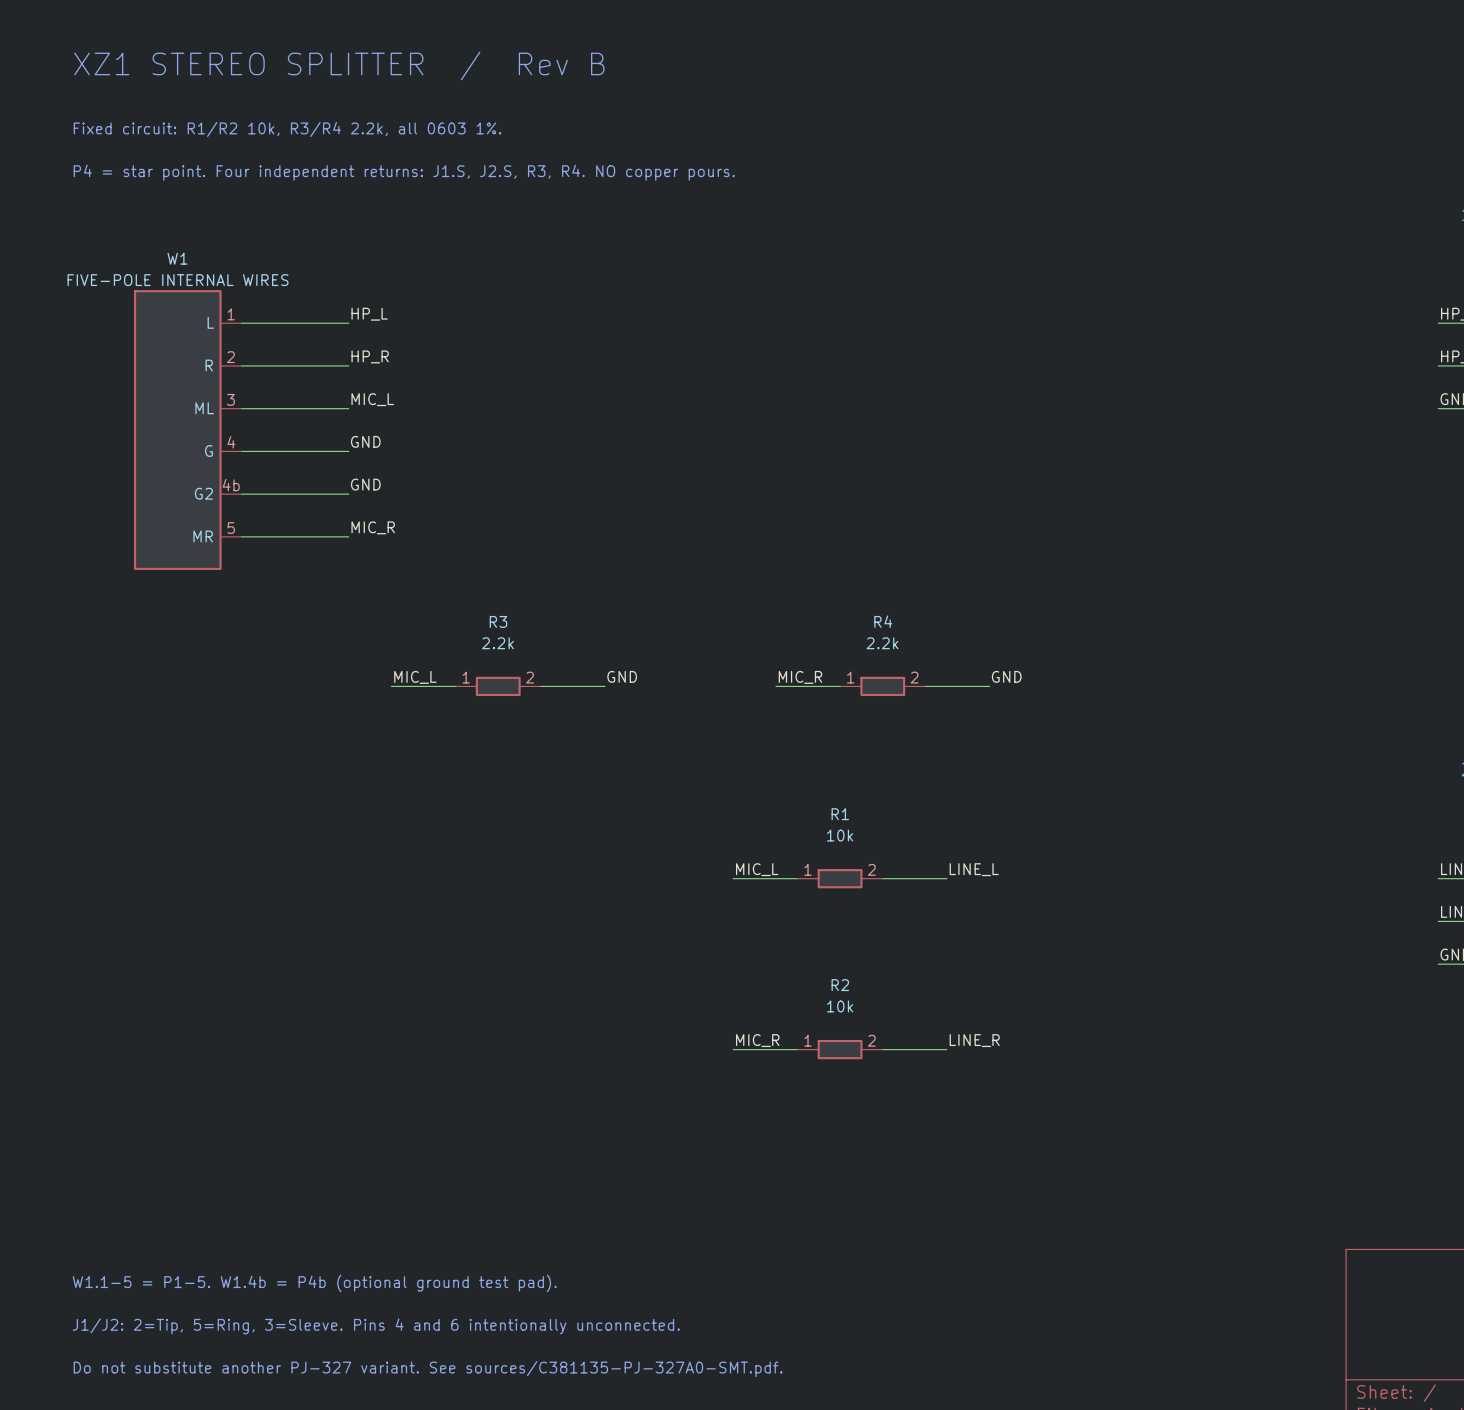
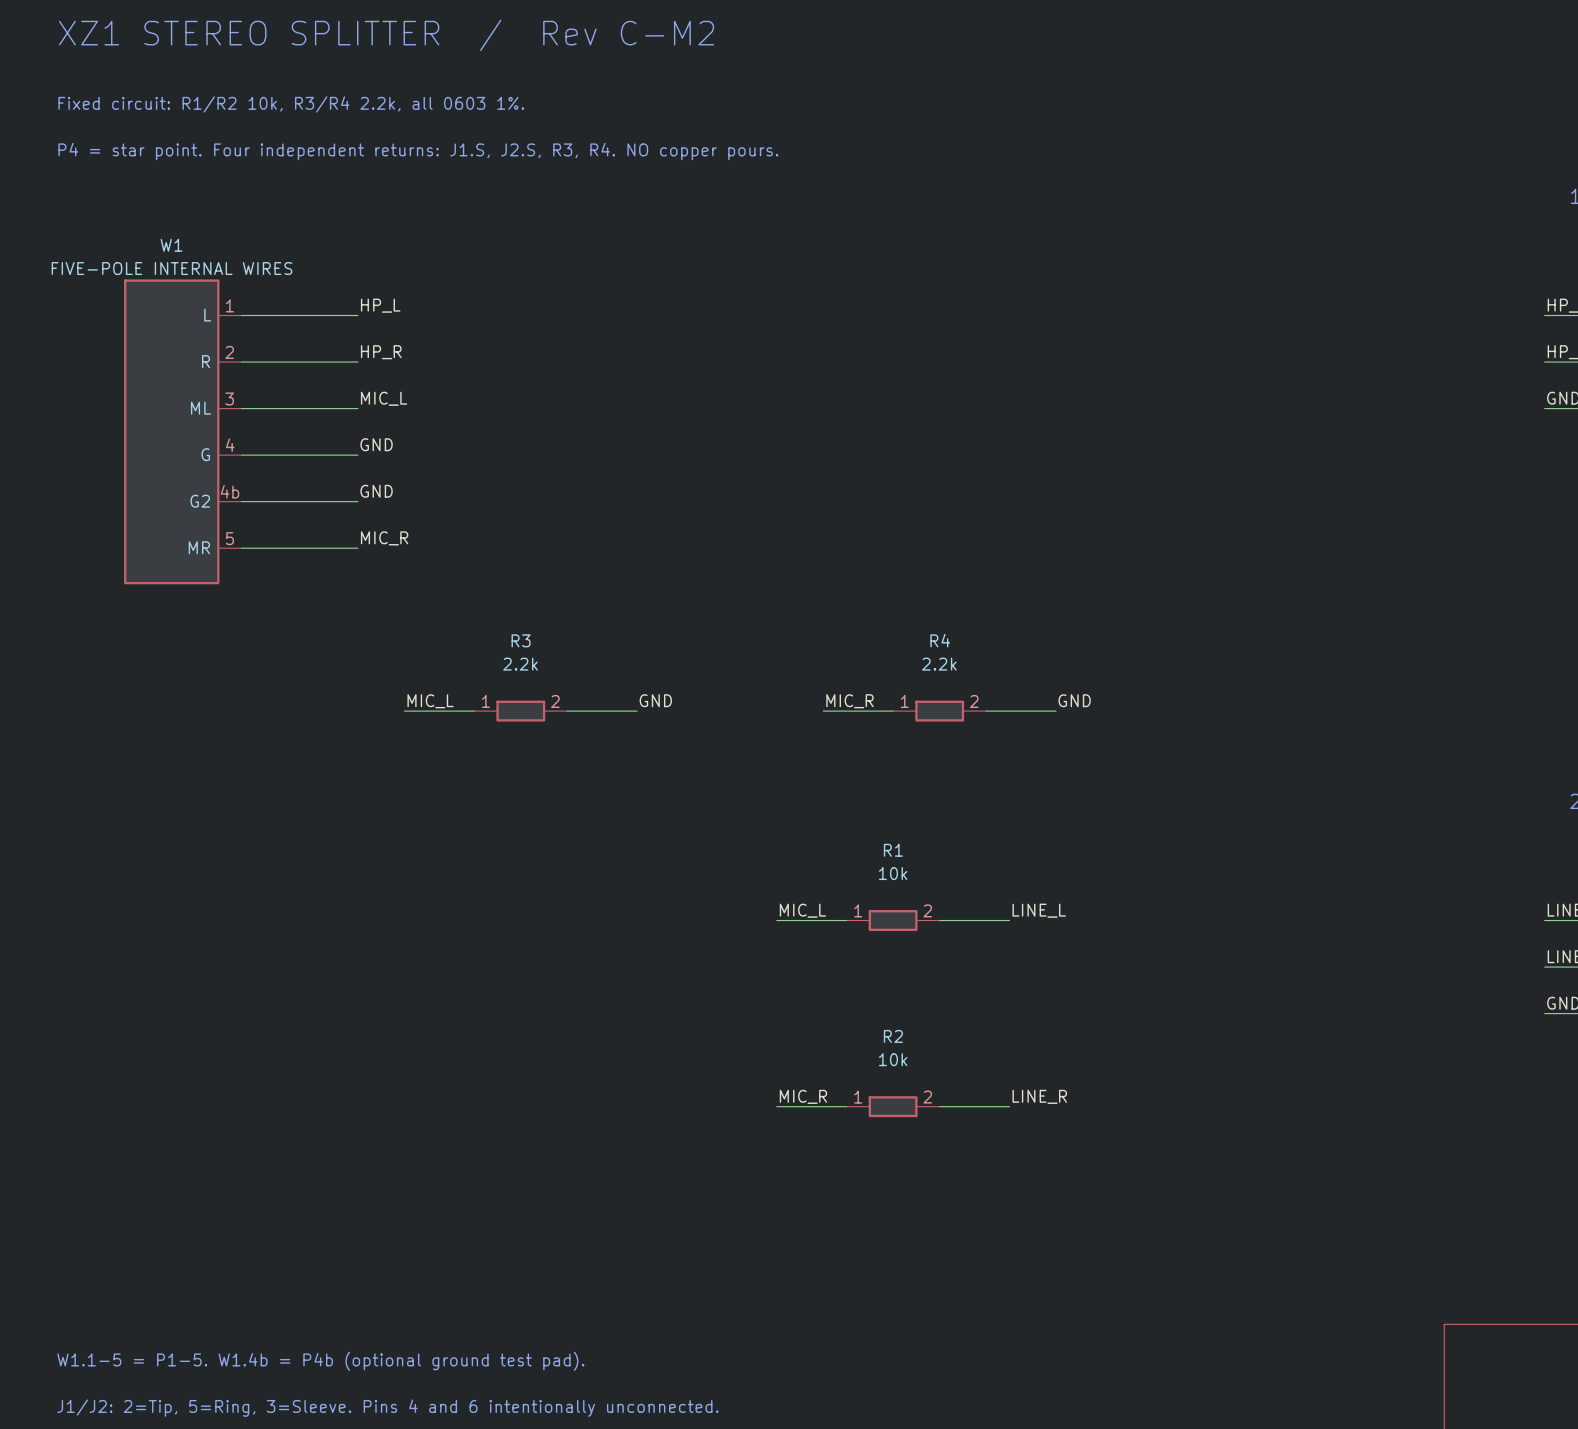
text: XZ1 STEREO SPLITTER / Rev B (339, 65) -> XZ1 STEREO SPLITTER / Rev C-M2 (386, 35)

